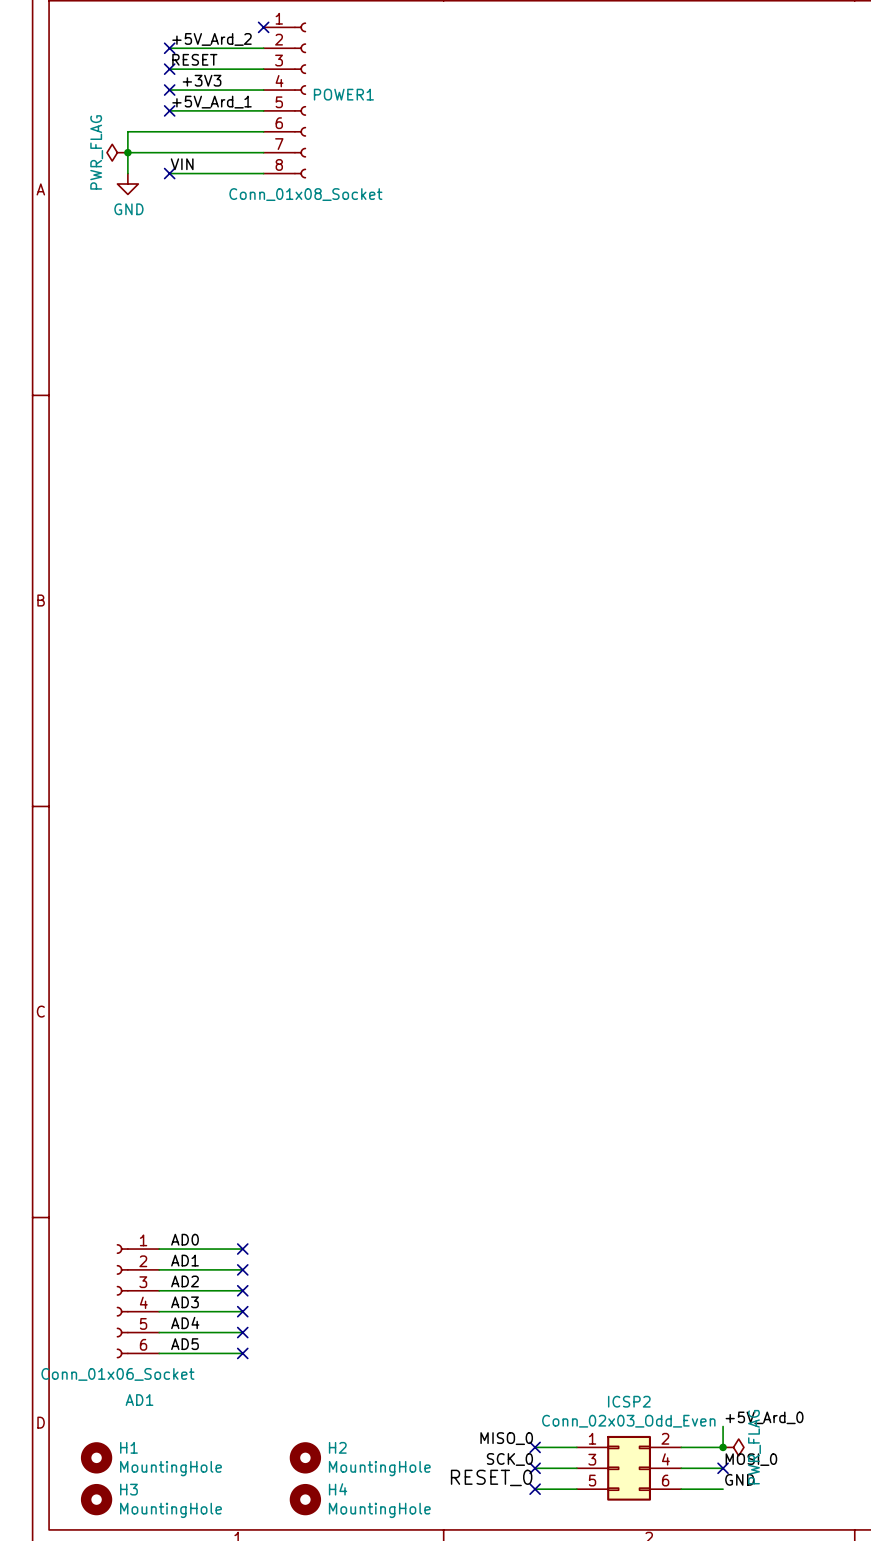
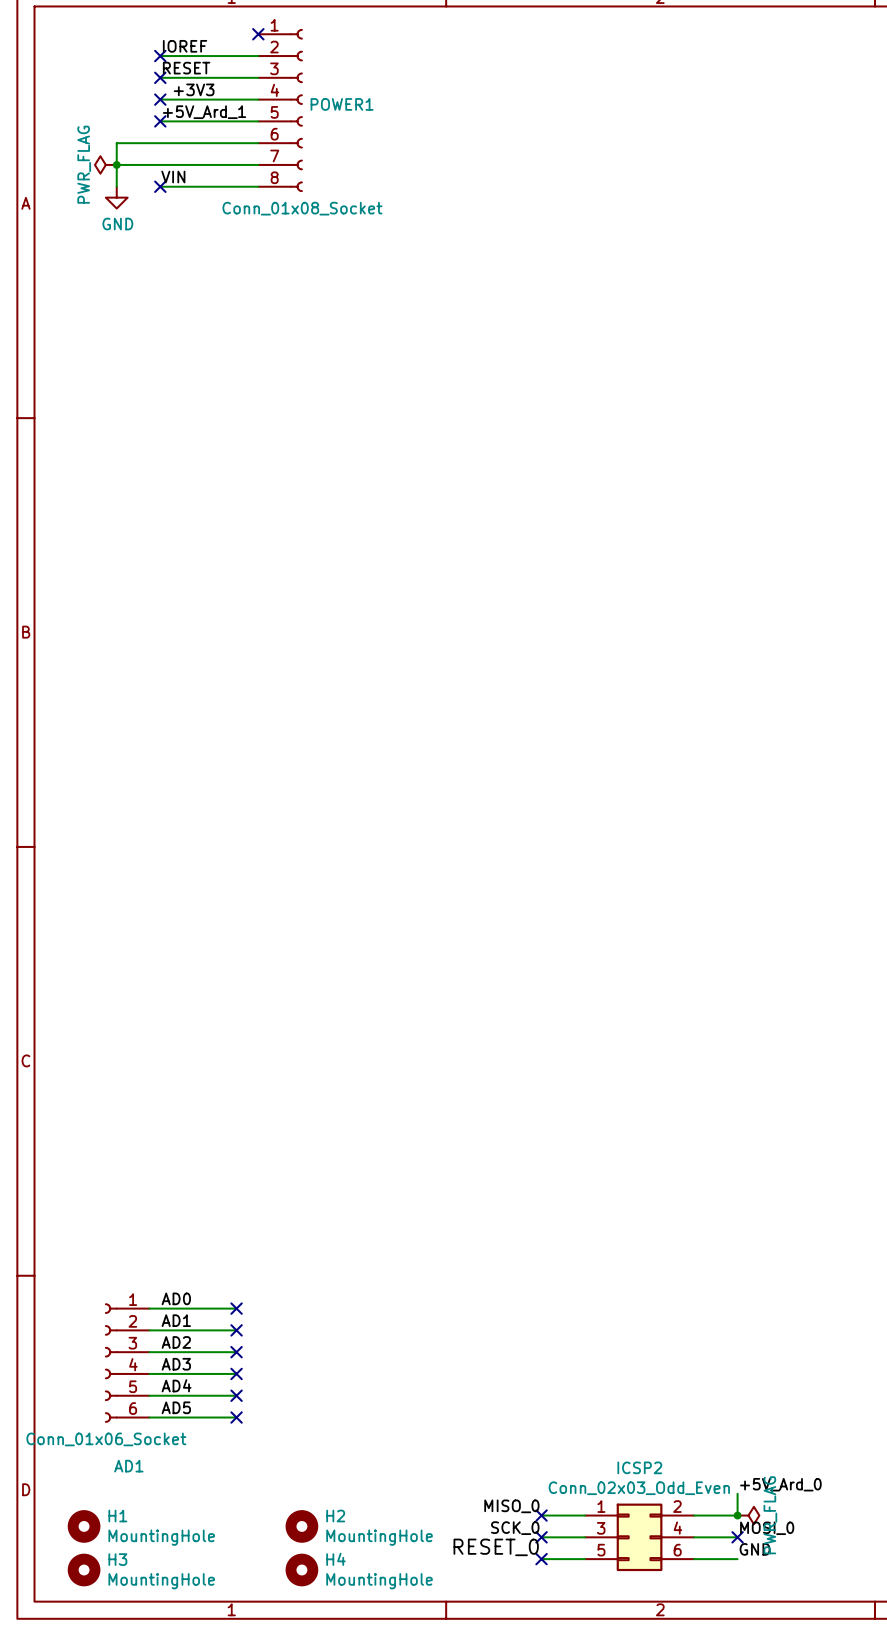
label: +5V_Ard_2 (212, 39) -> IOREF (185, 46)

